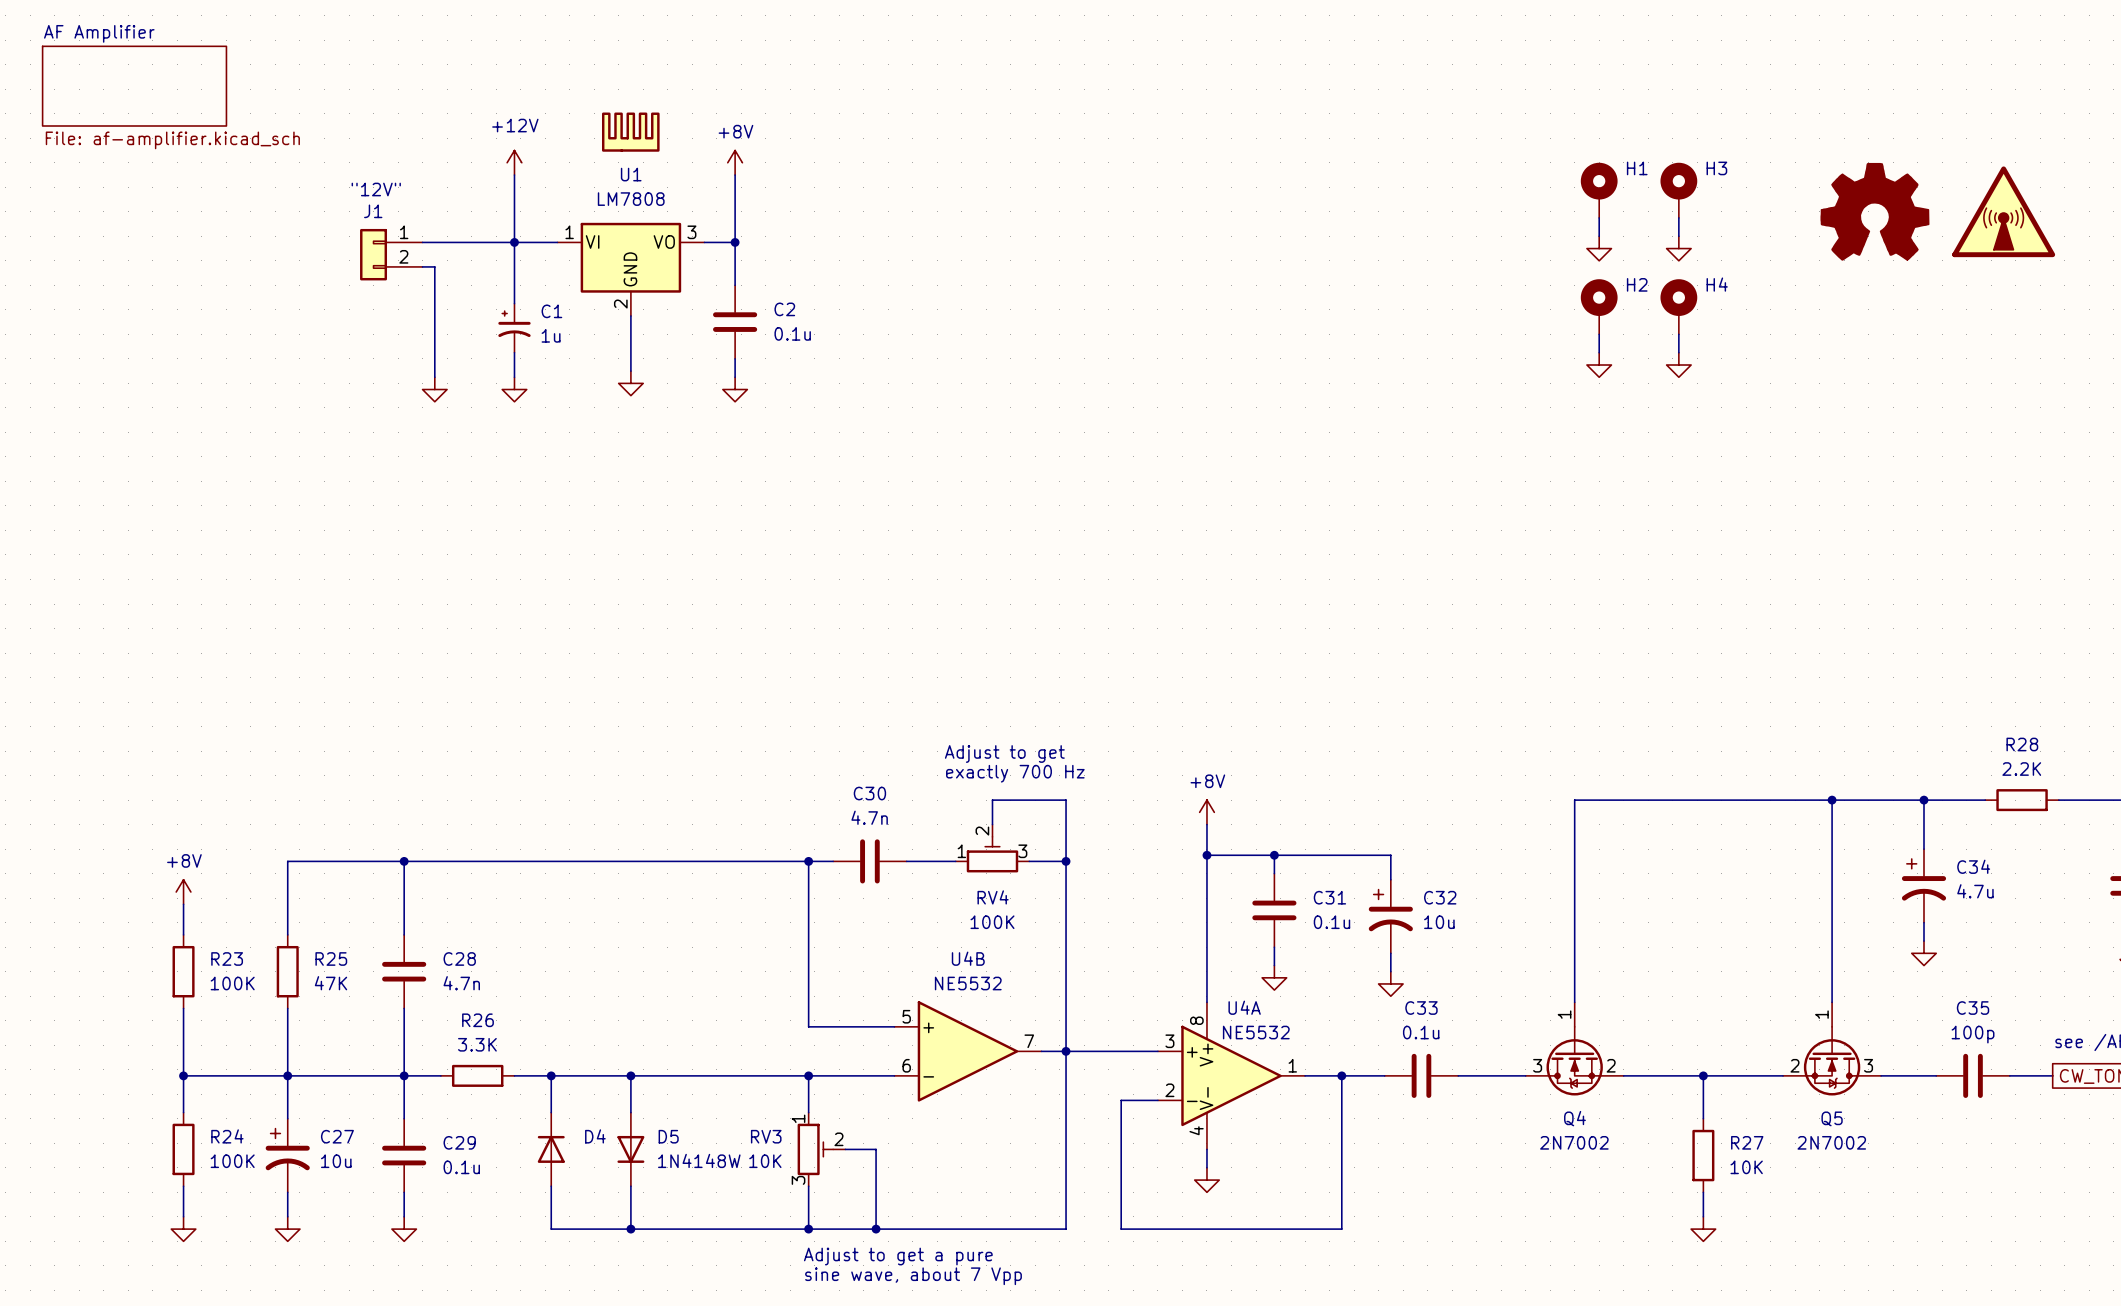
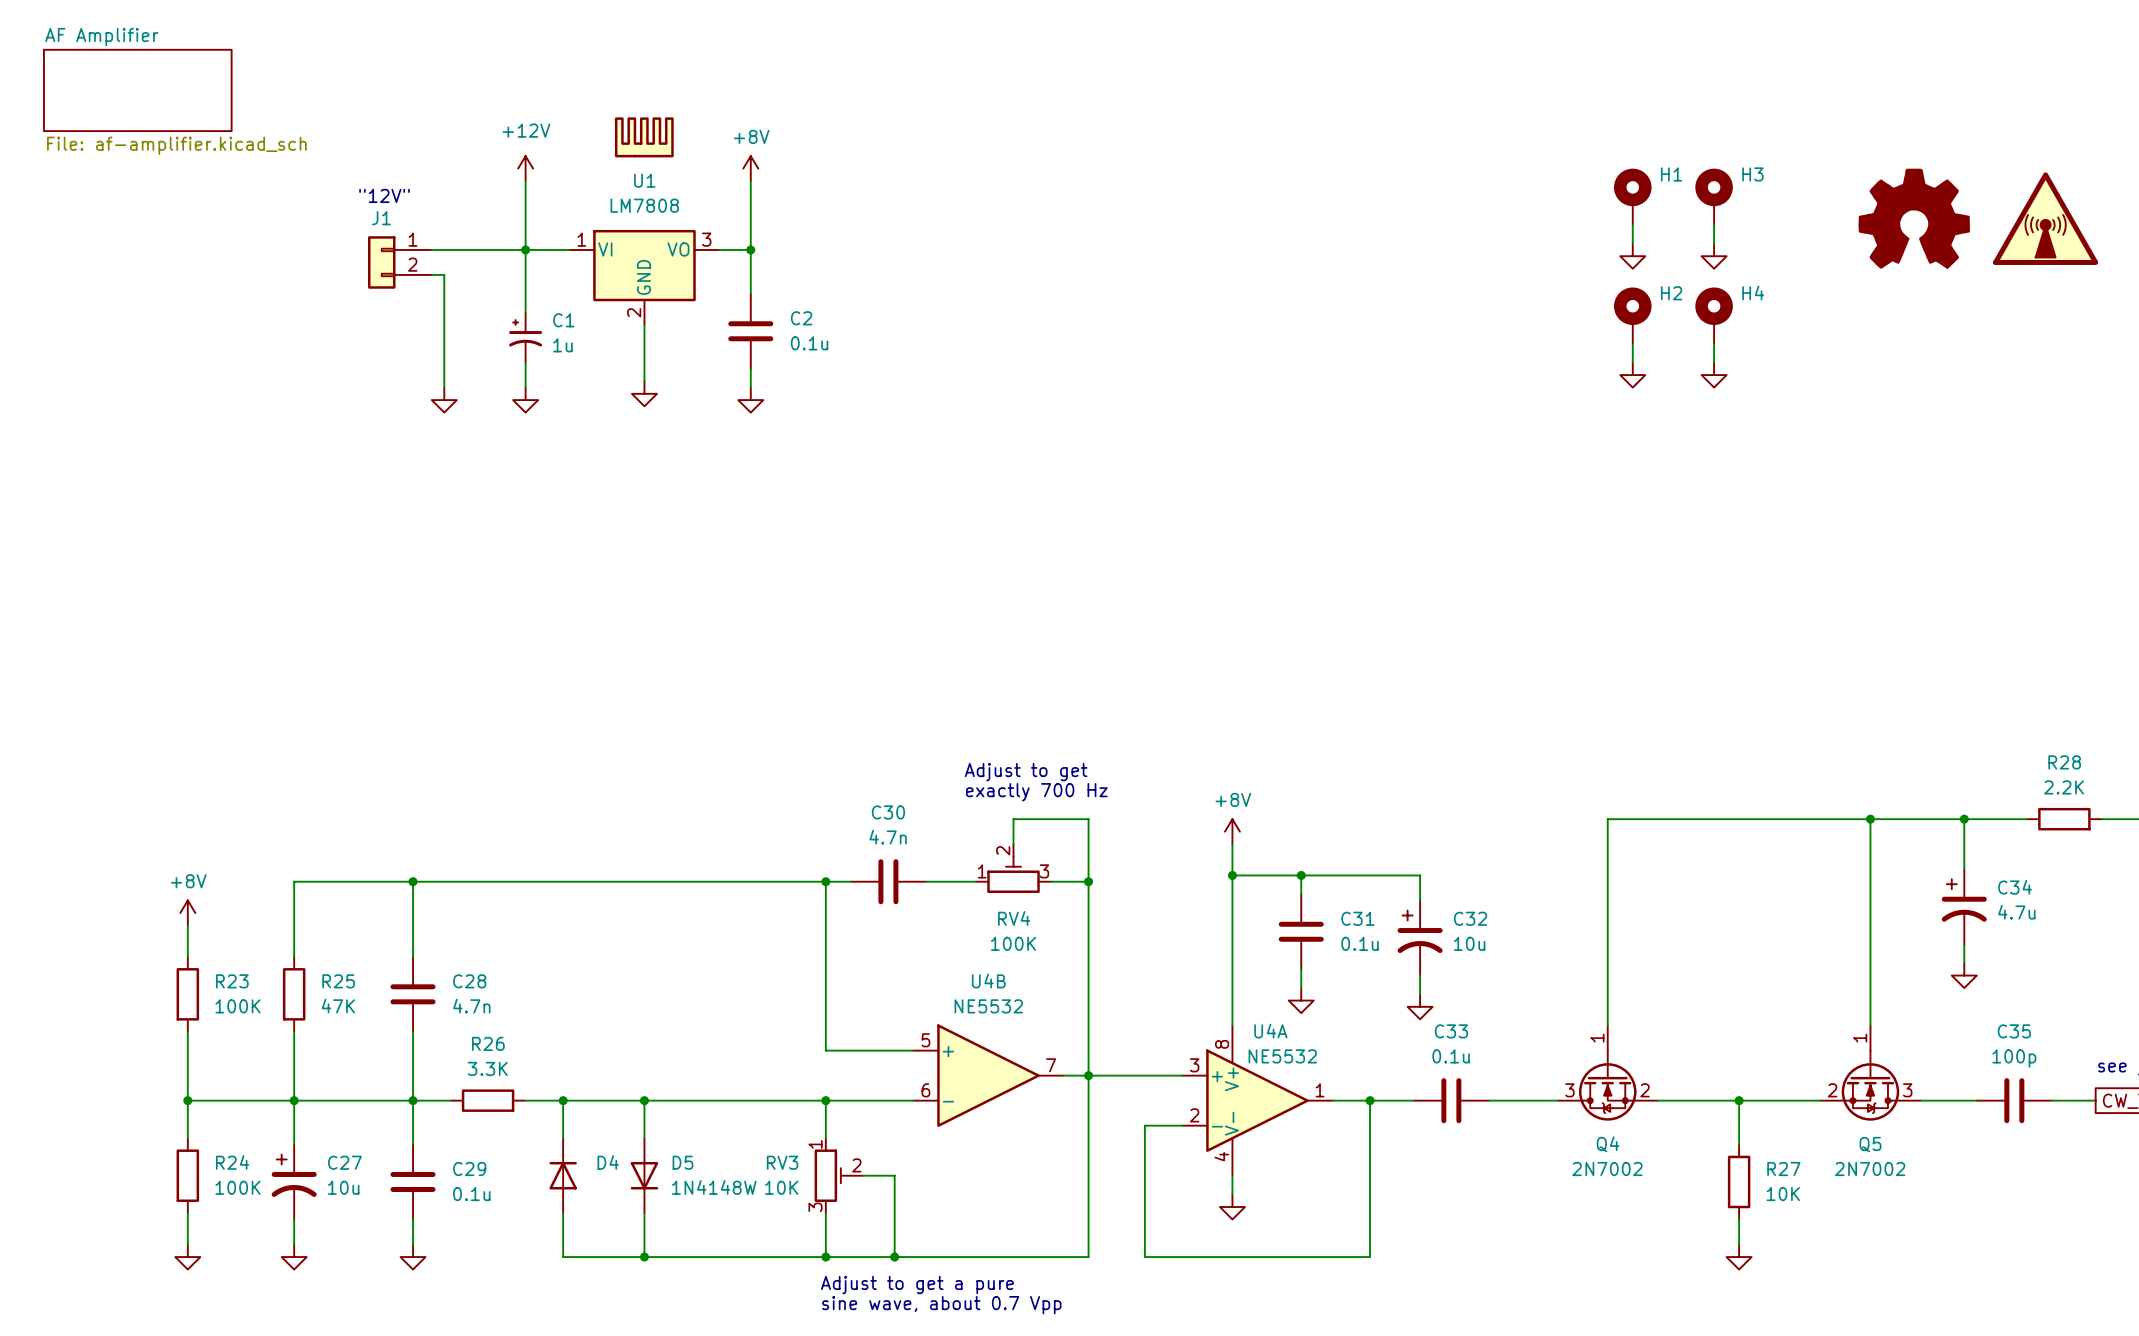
text: sine wave, about 7 Vpp (913, 1276) -> sine wave, about 0.7 Vpp (941, 1305)

